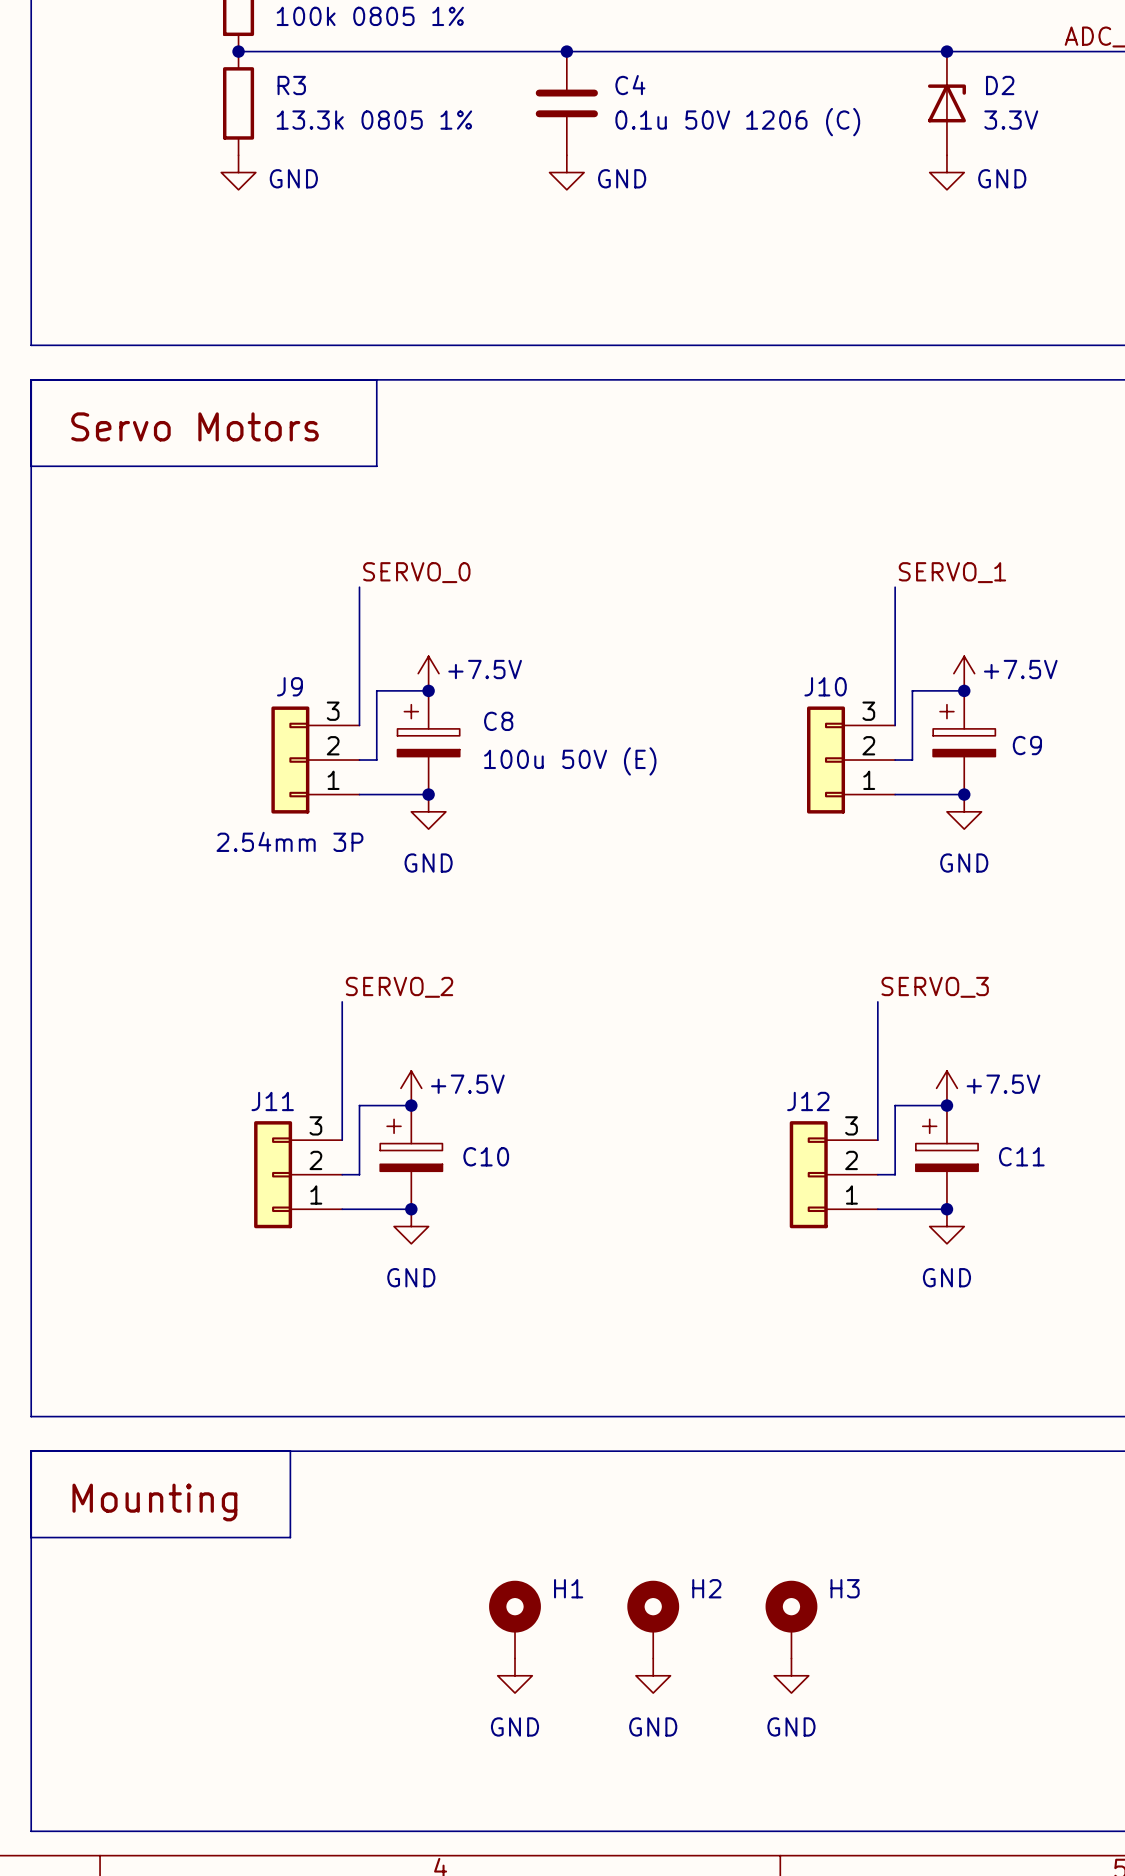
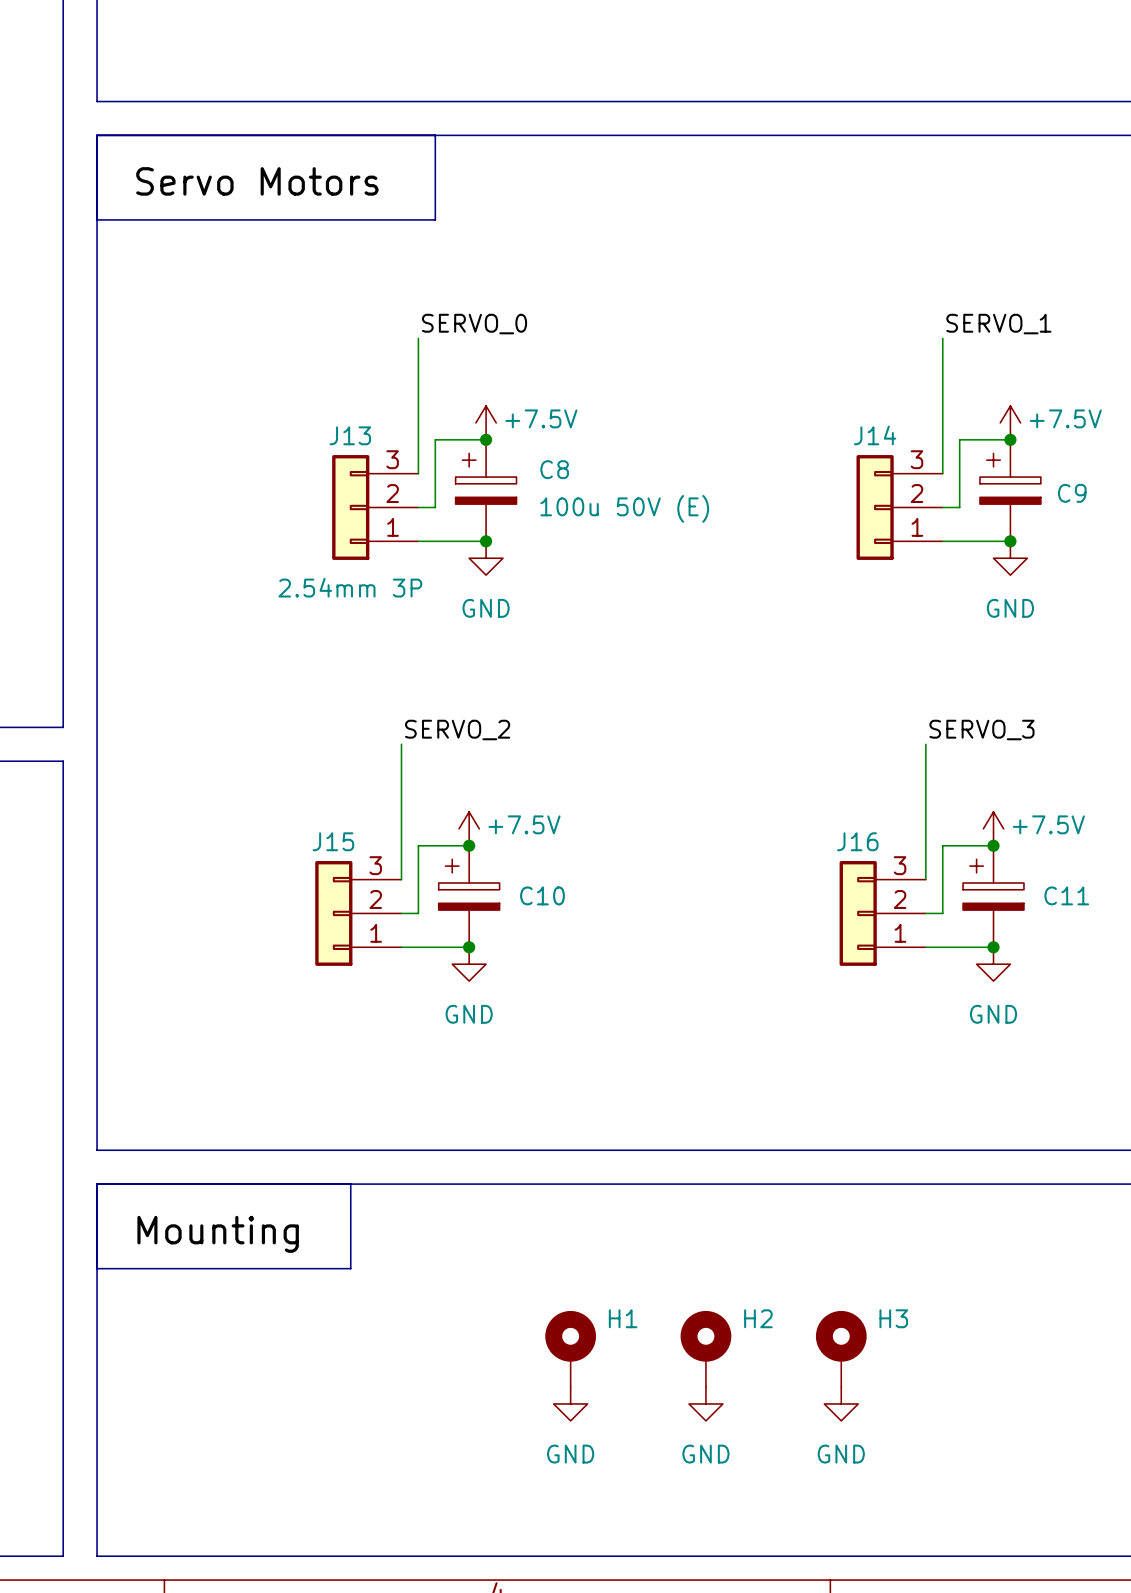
J9 name: J9 (289, 686) -> J13 (350, 435)
J10 name: J10 (825, 686) -> J14 (875, 435)
J11 name: J11 (272, 1101) -> J15 (333, 841)
J12 name: J12 (808, 1101) -> J16 (857, 841)

